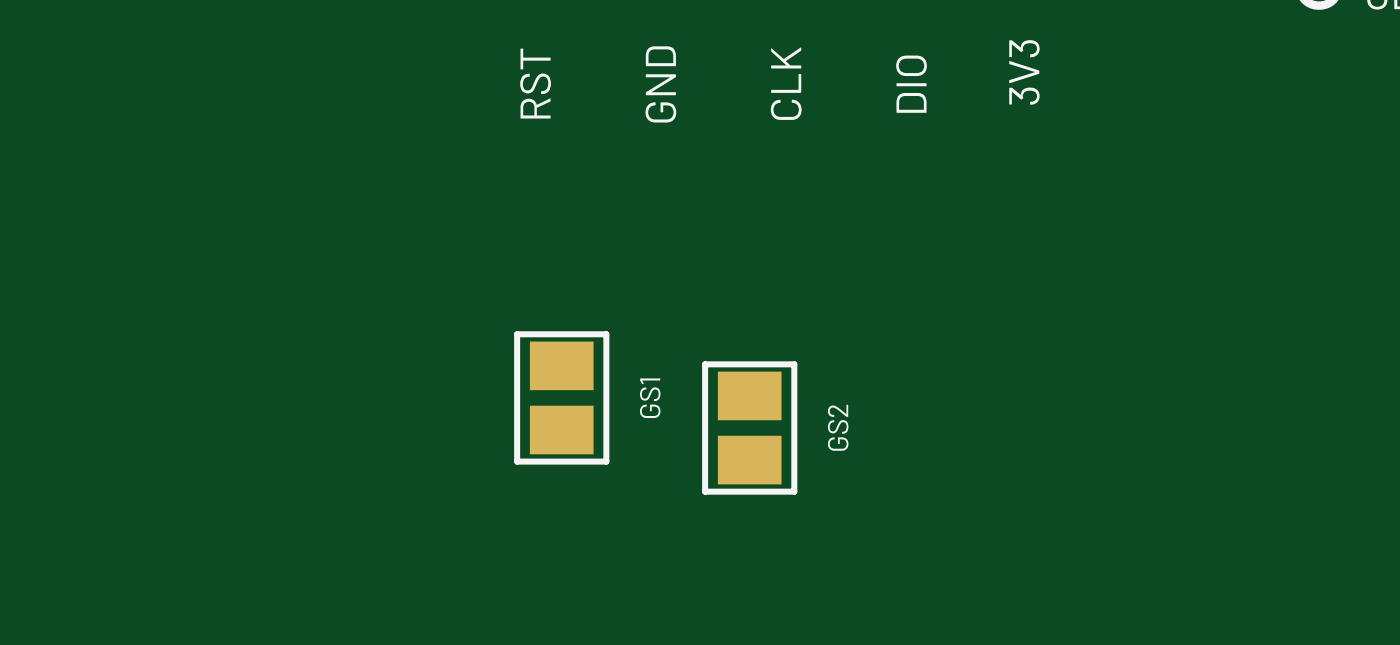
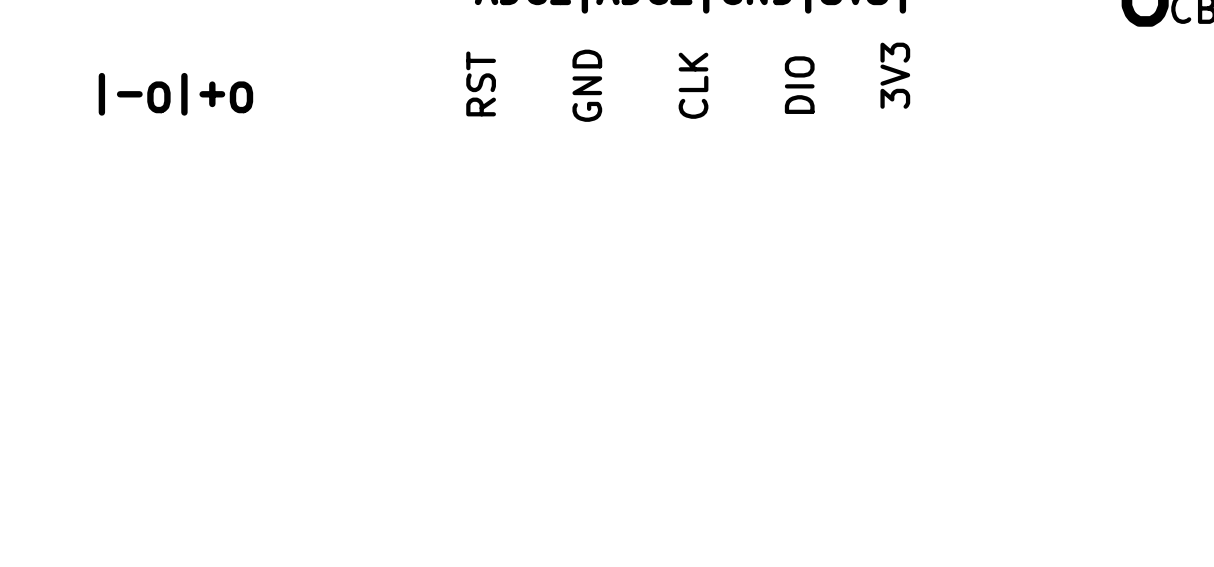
text: none -> O+|O-| (175, 94)
GS1: (561, 397) -> none
GS2: (749, 428) -> none

